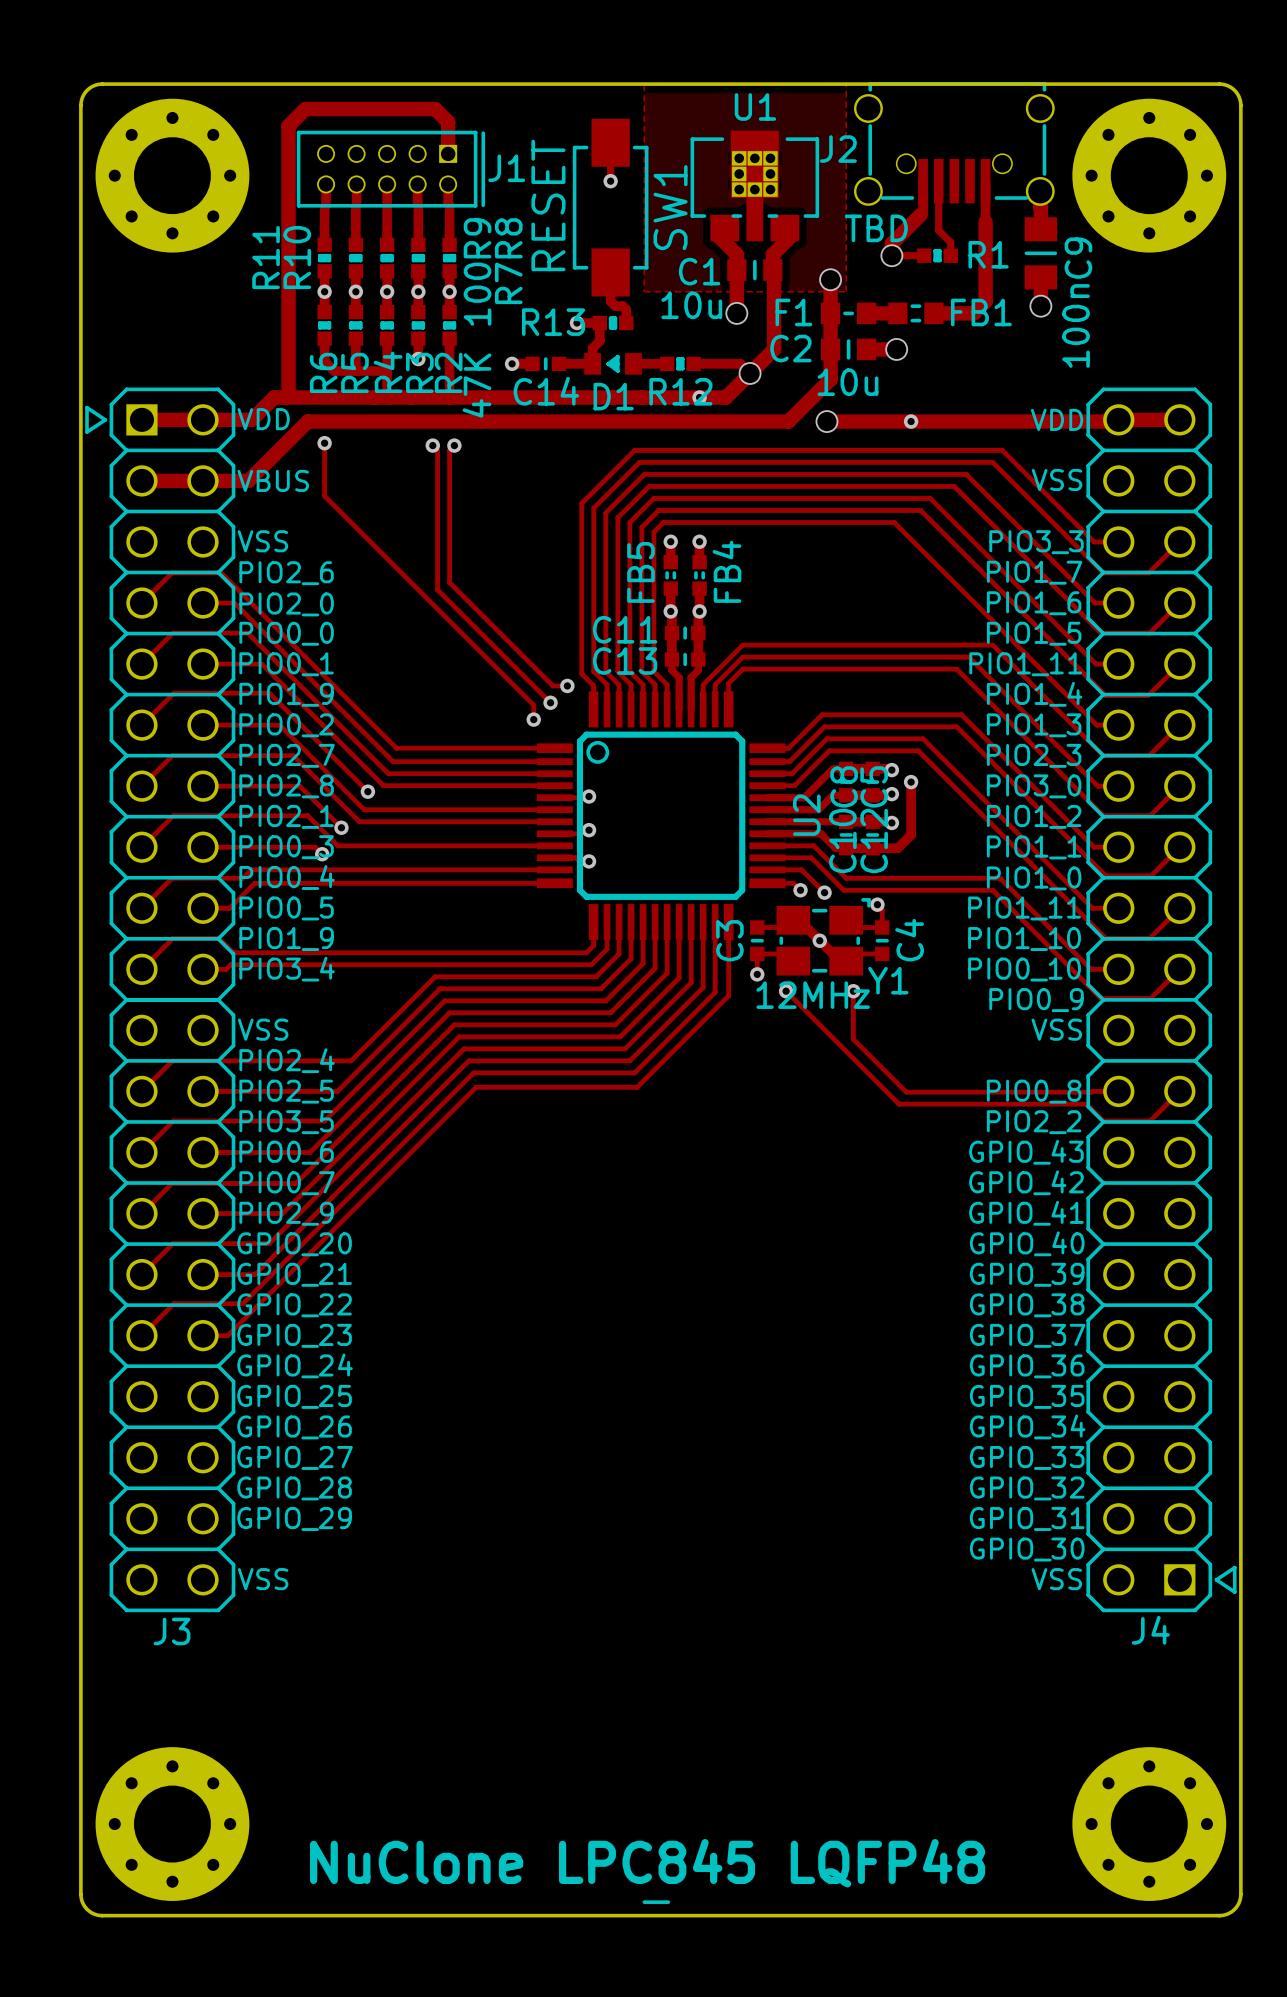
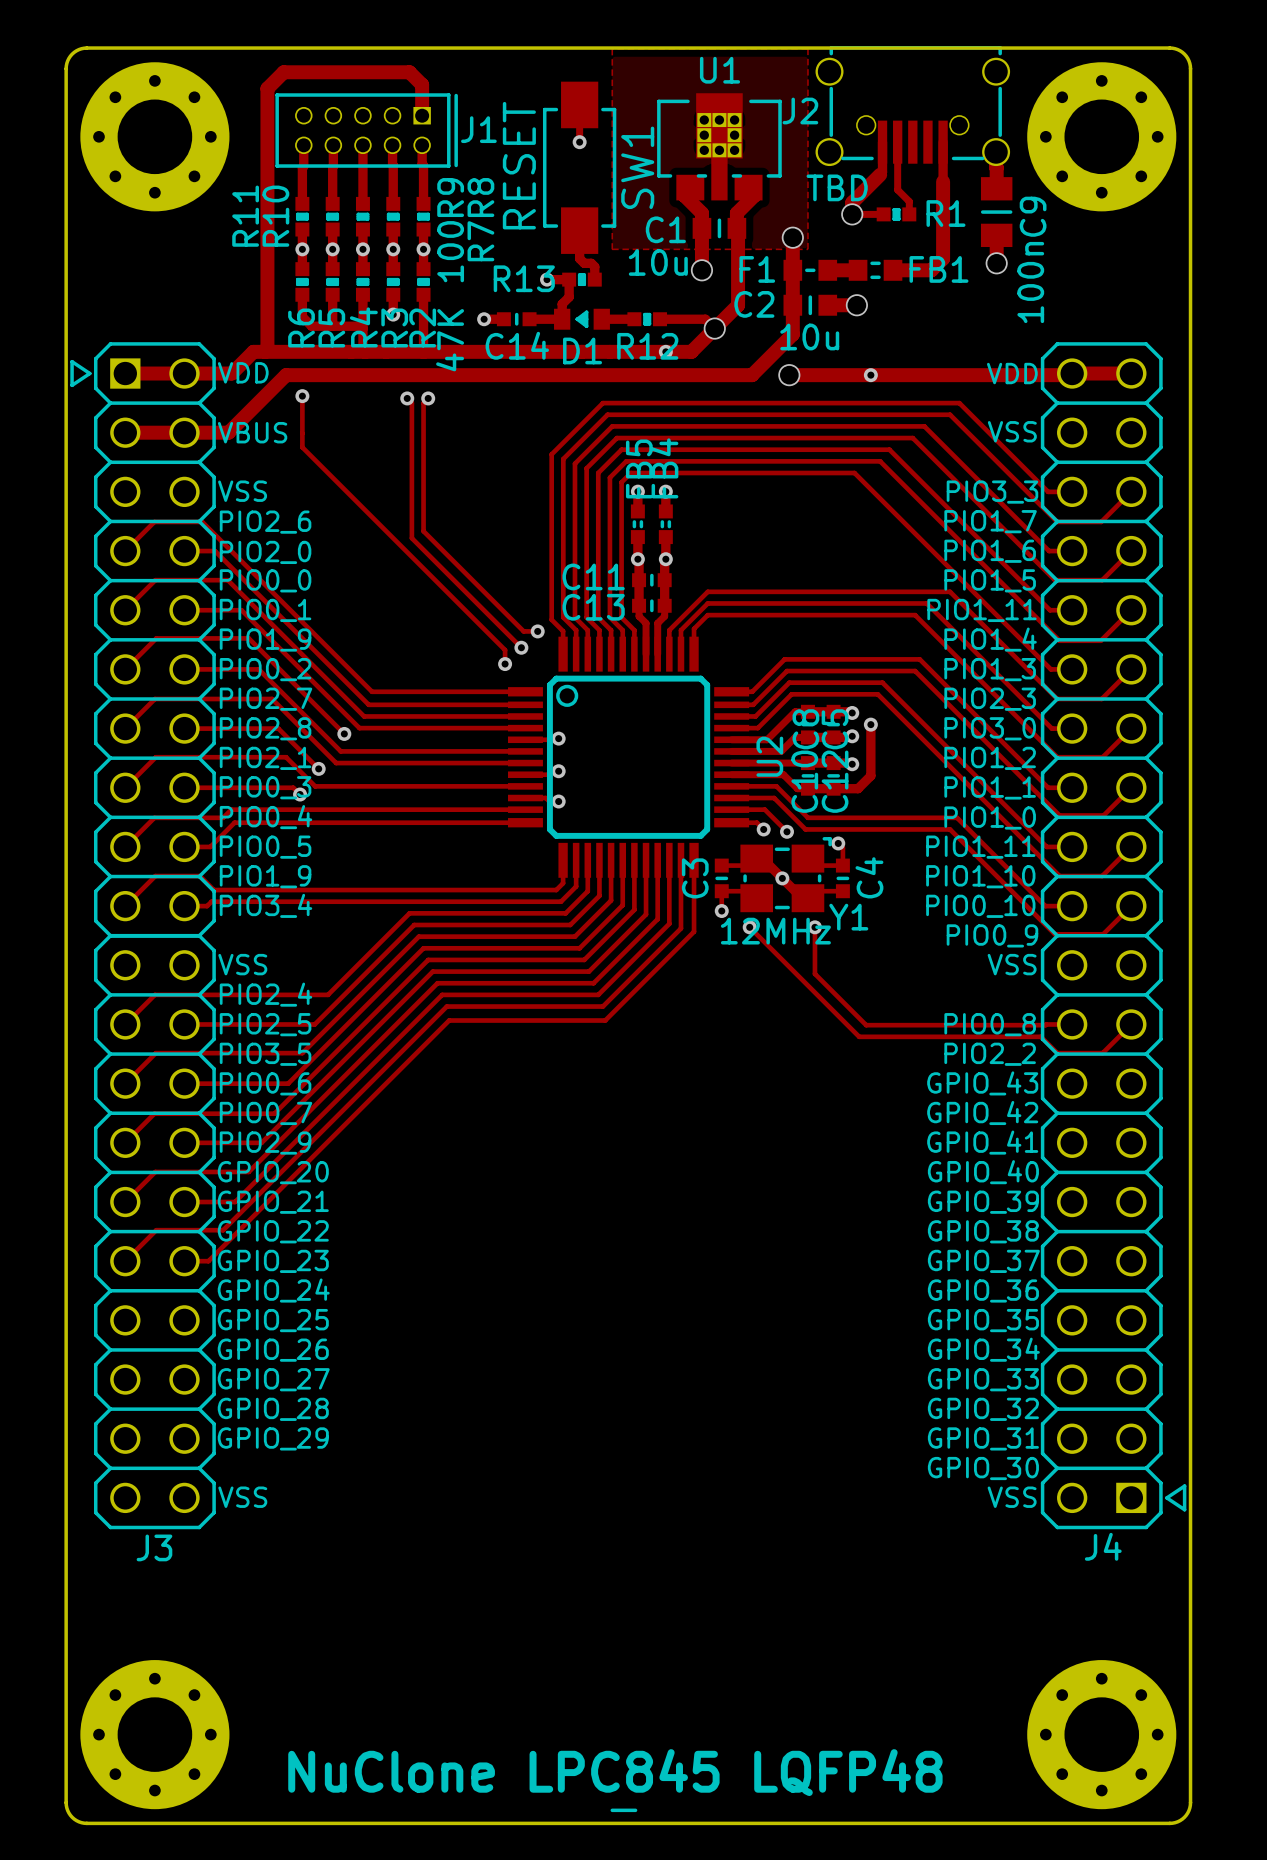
FB4 name position: FB4 (726, 571) -> FB4 (664, 468)
FB5 name position: FB5 (640, 572) -> FB5 (639, 468)

